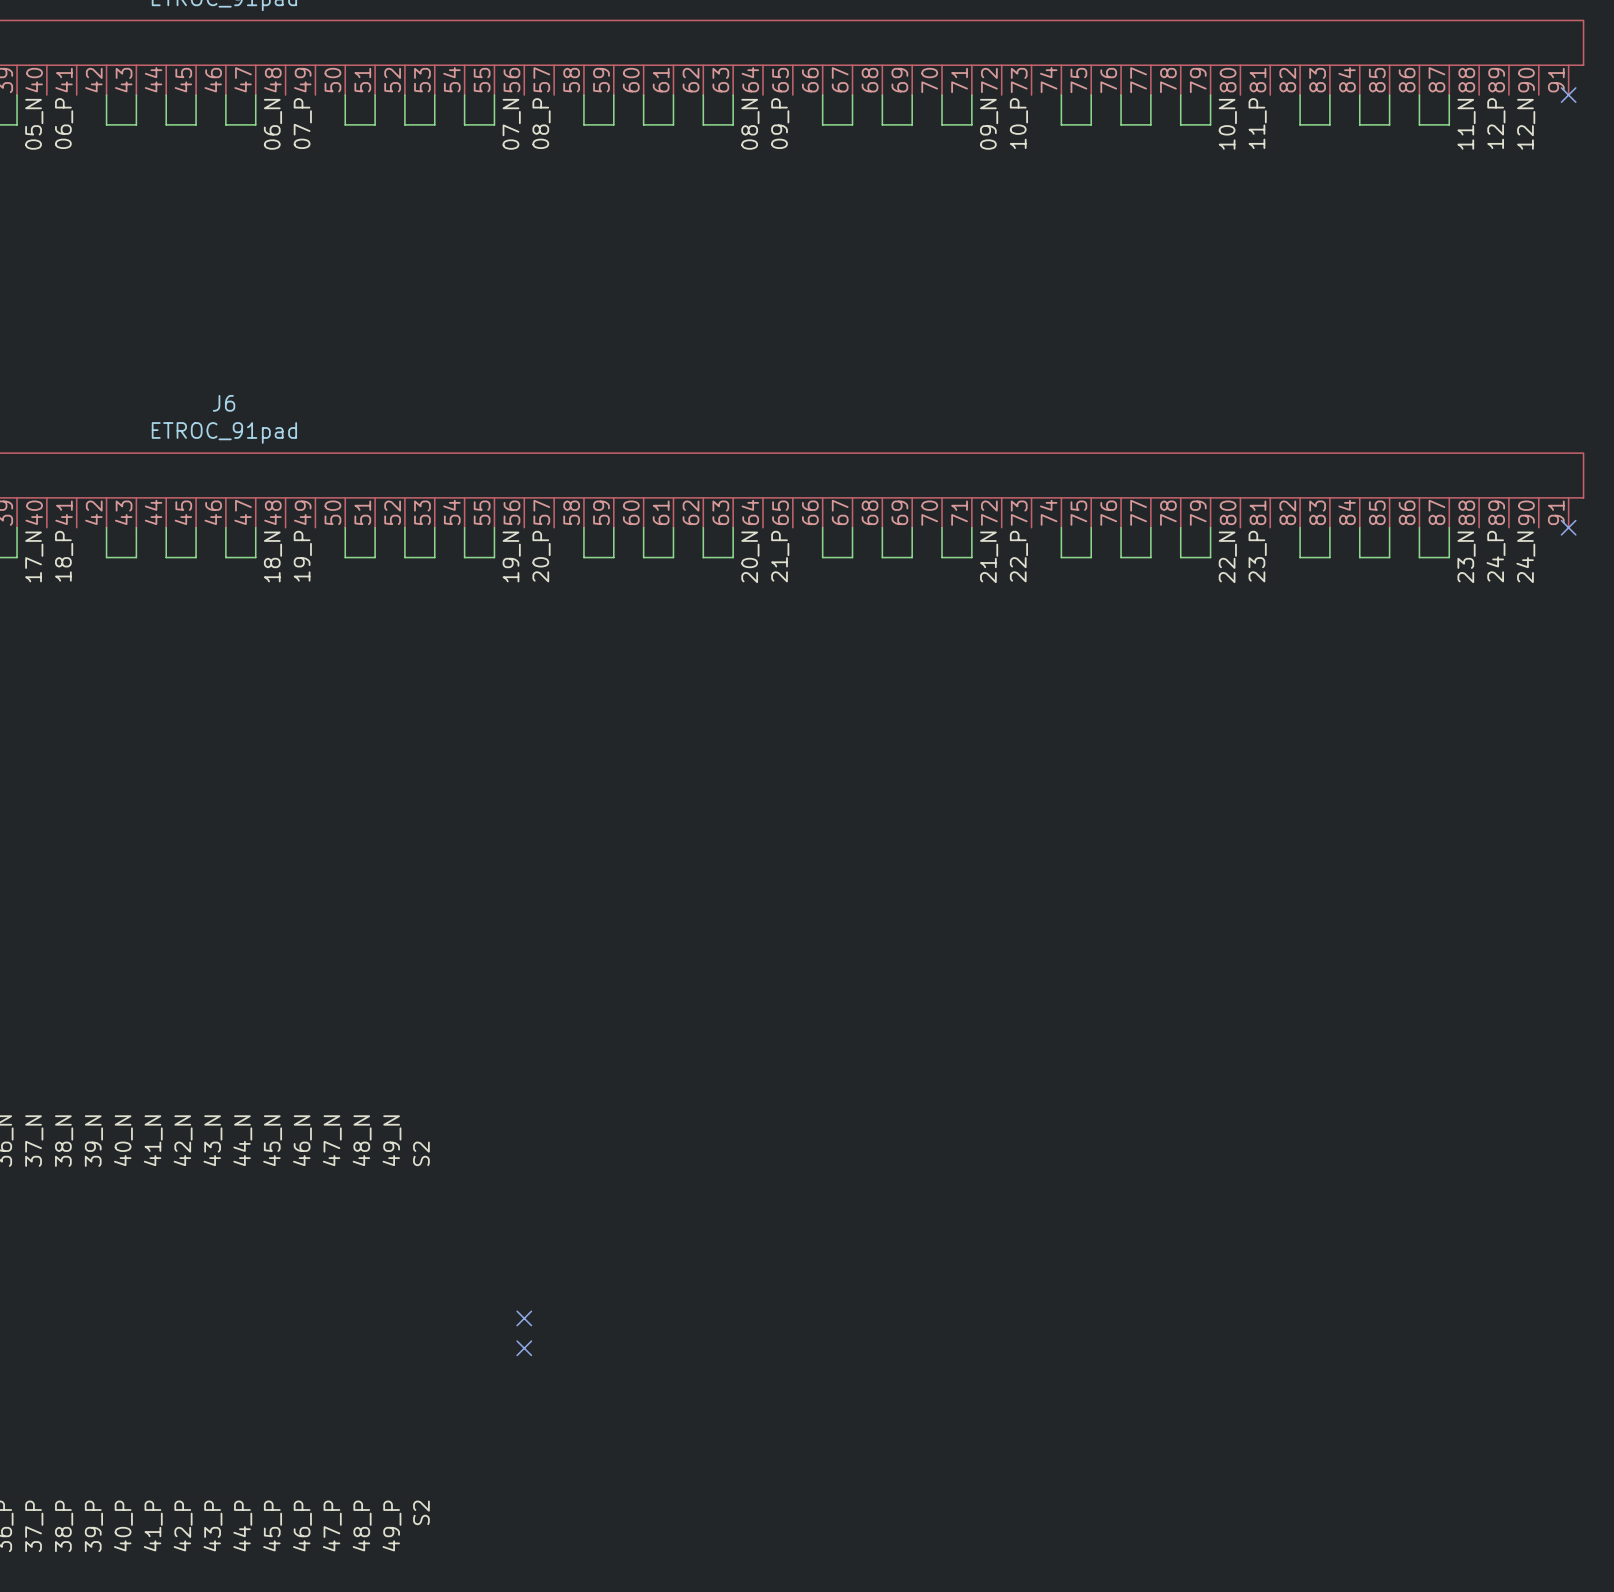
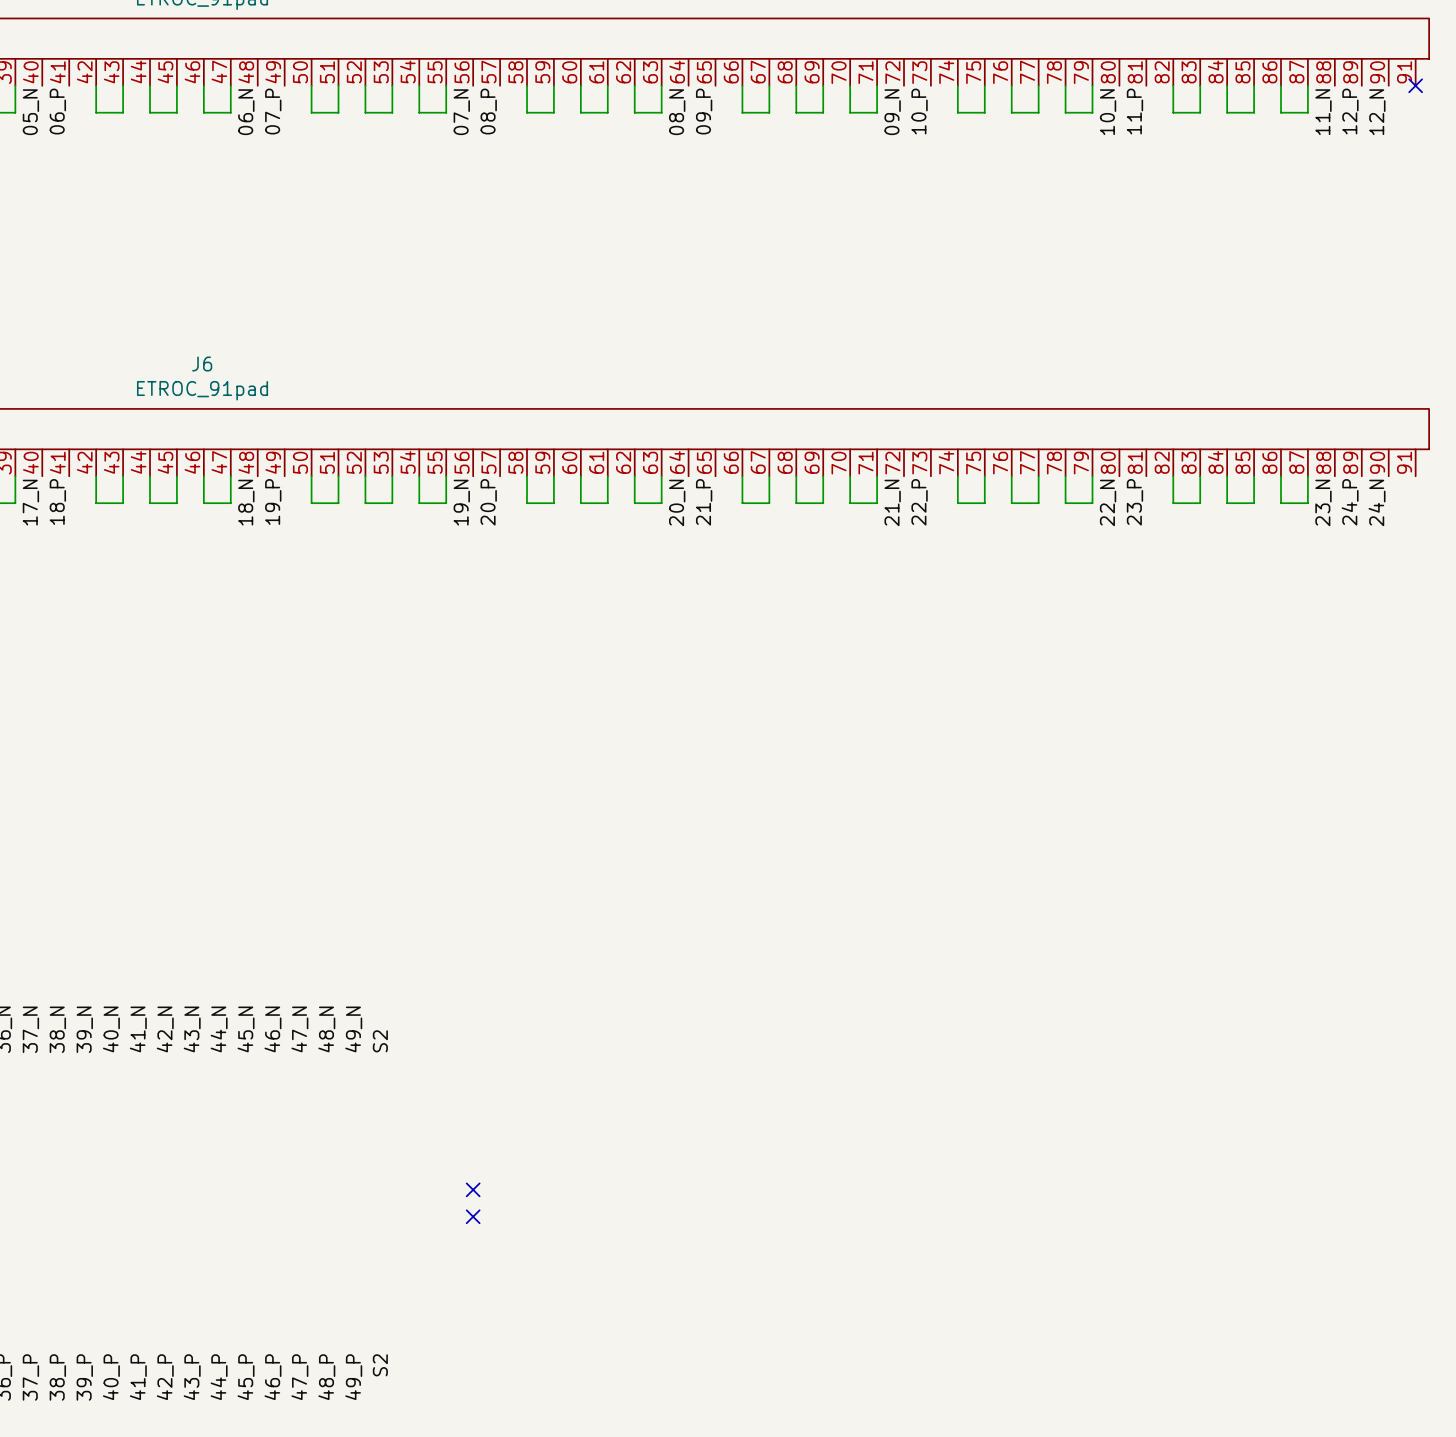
no-connect mark: (1568, 527) -> none

